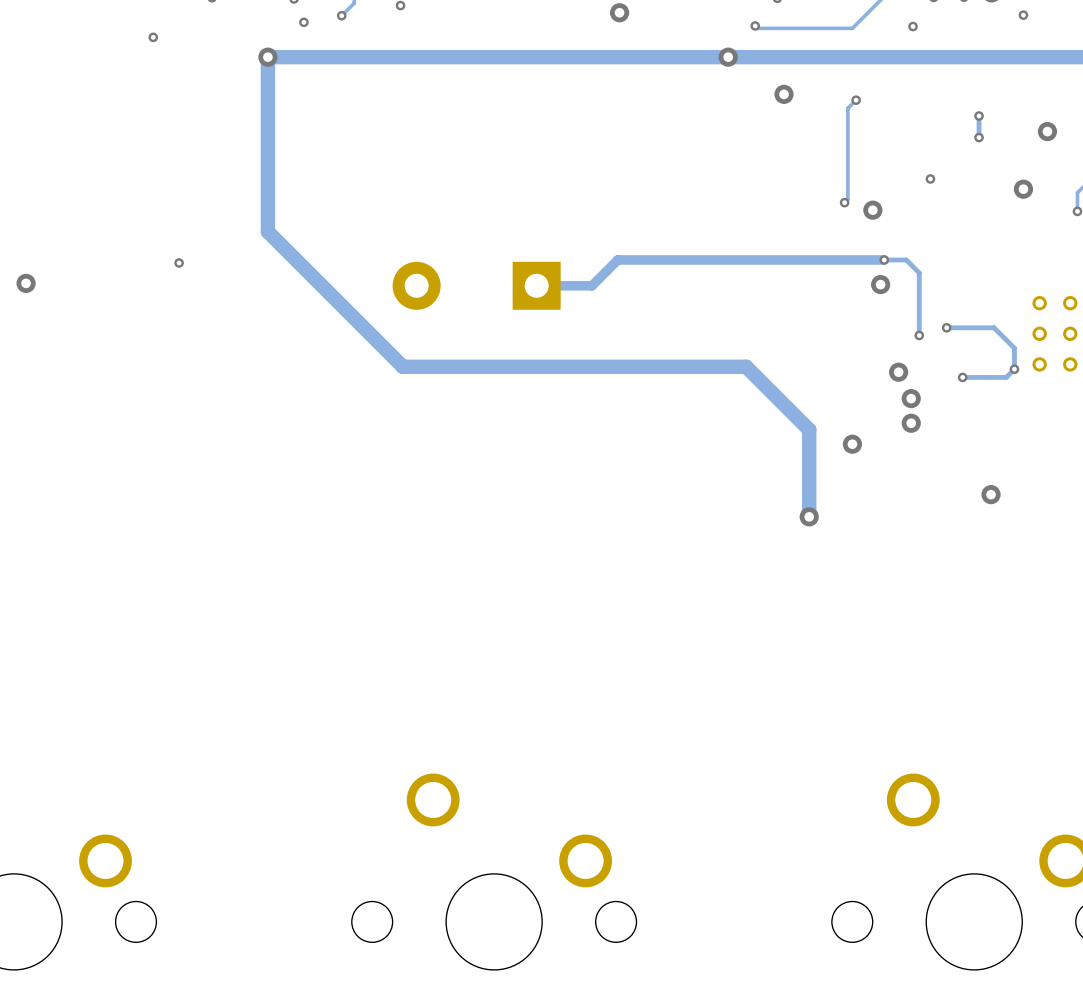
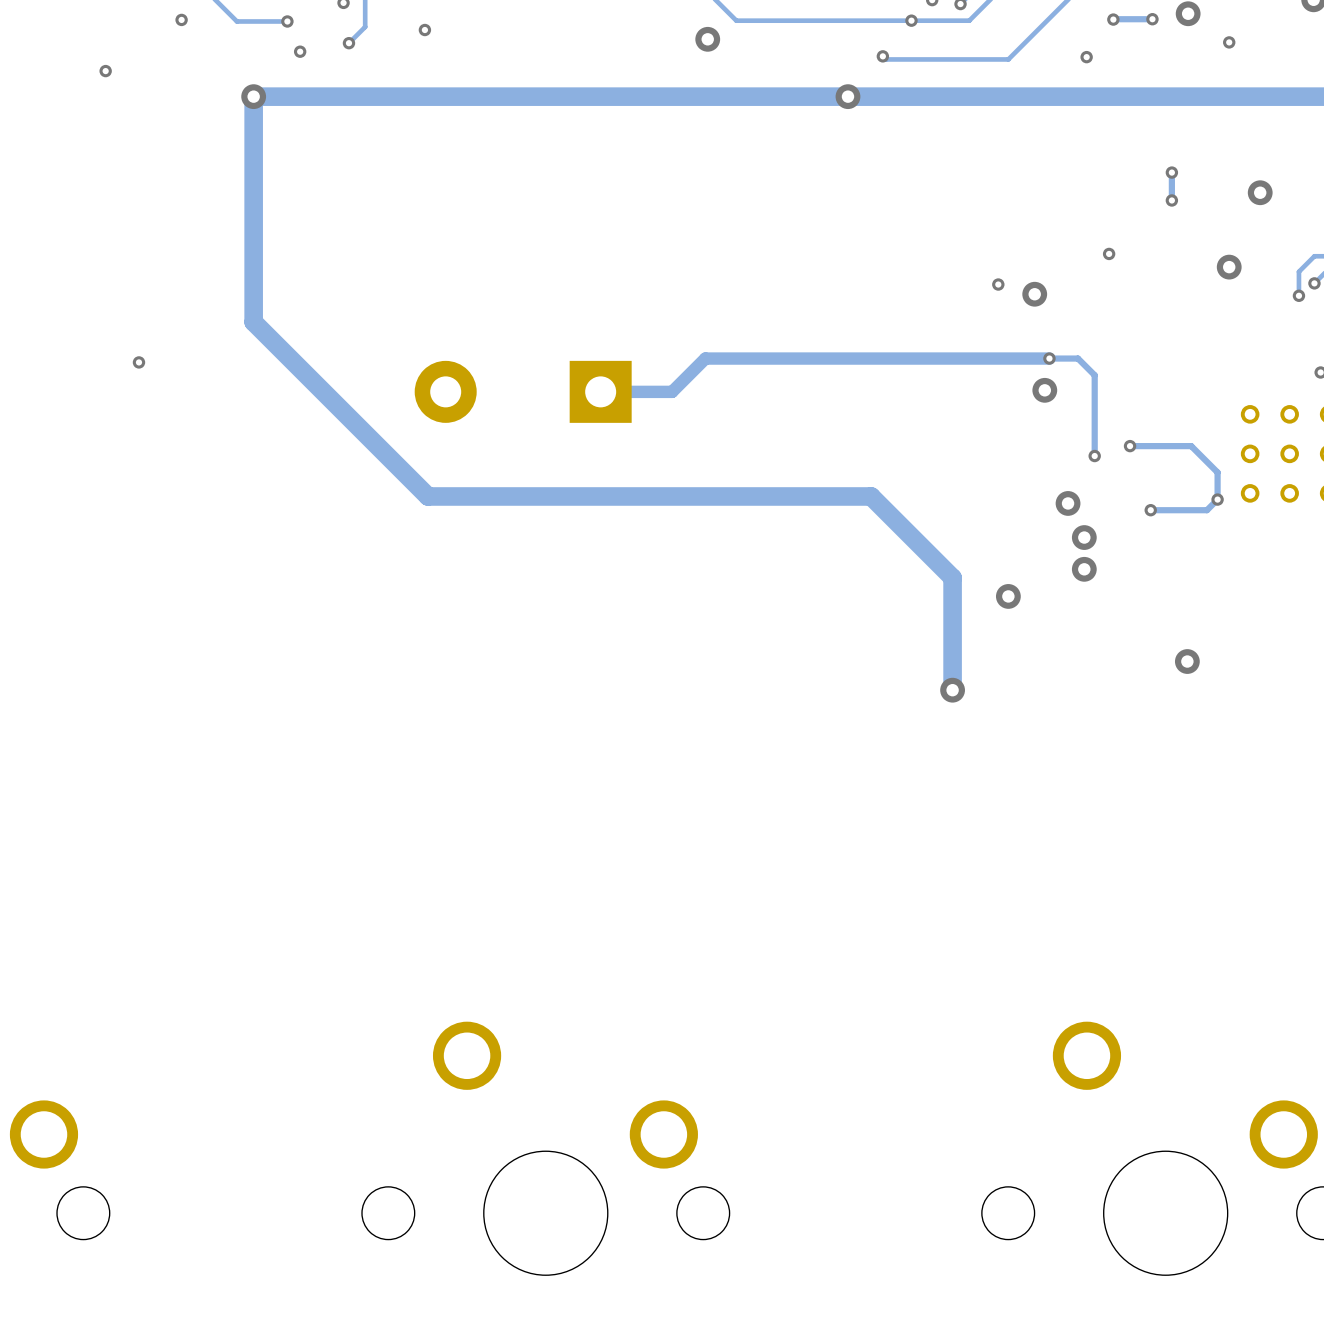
via: (784, 94) -> none
track: (856, 100) (847, 108) (847, 199) (844, 202) -> none
via: (856, 100) -> none

